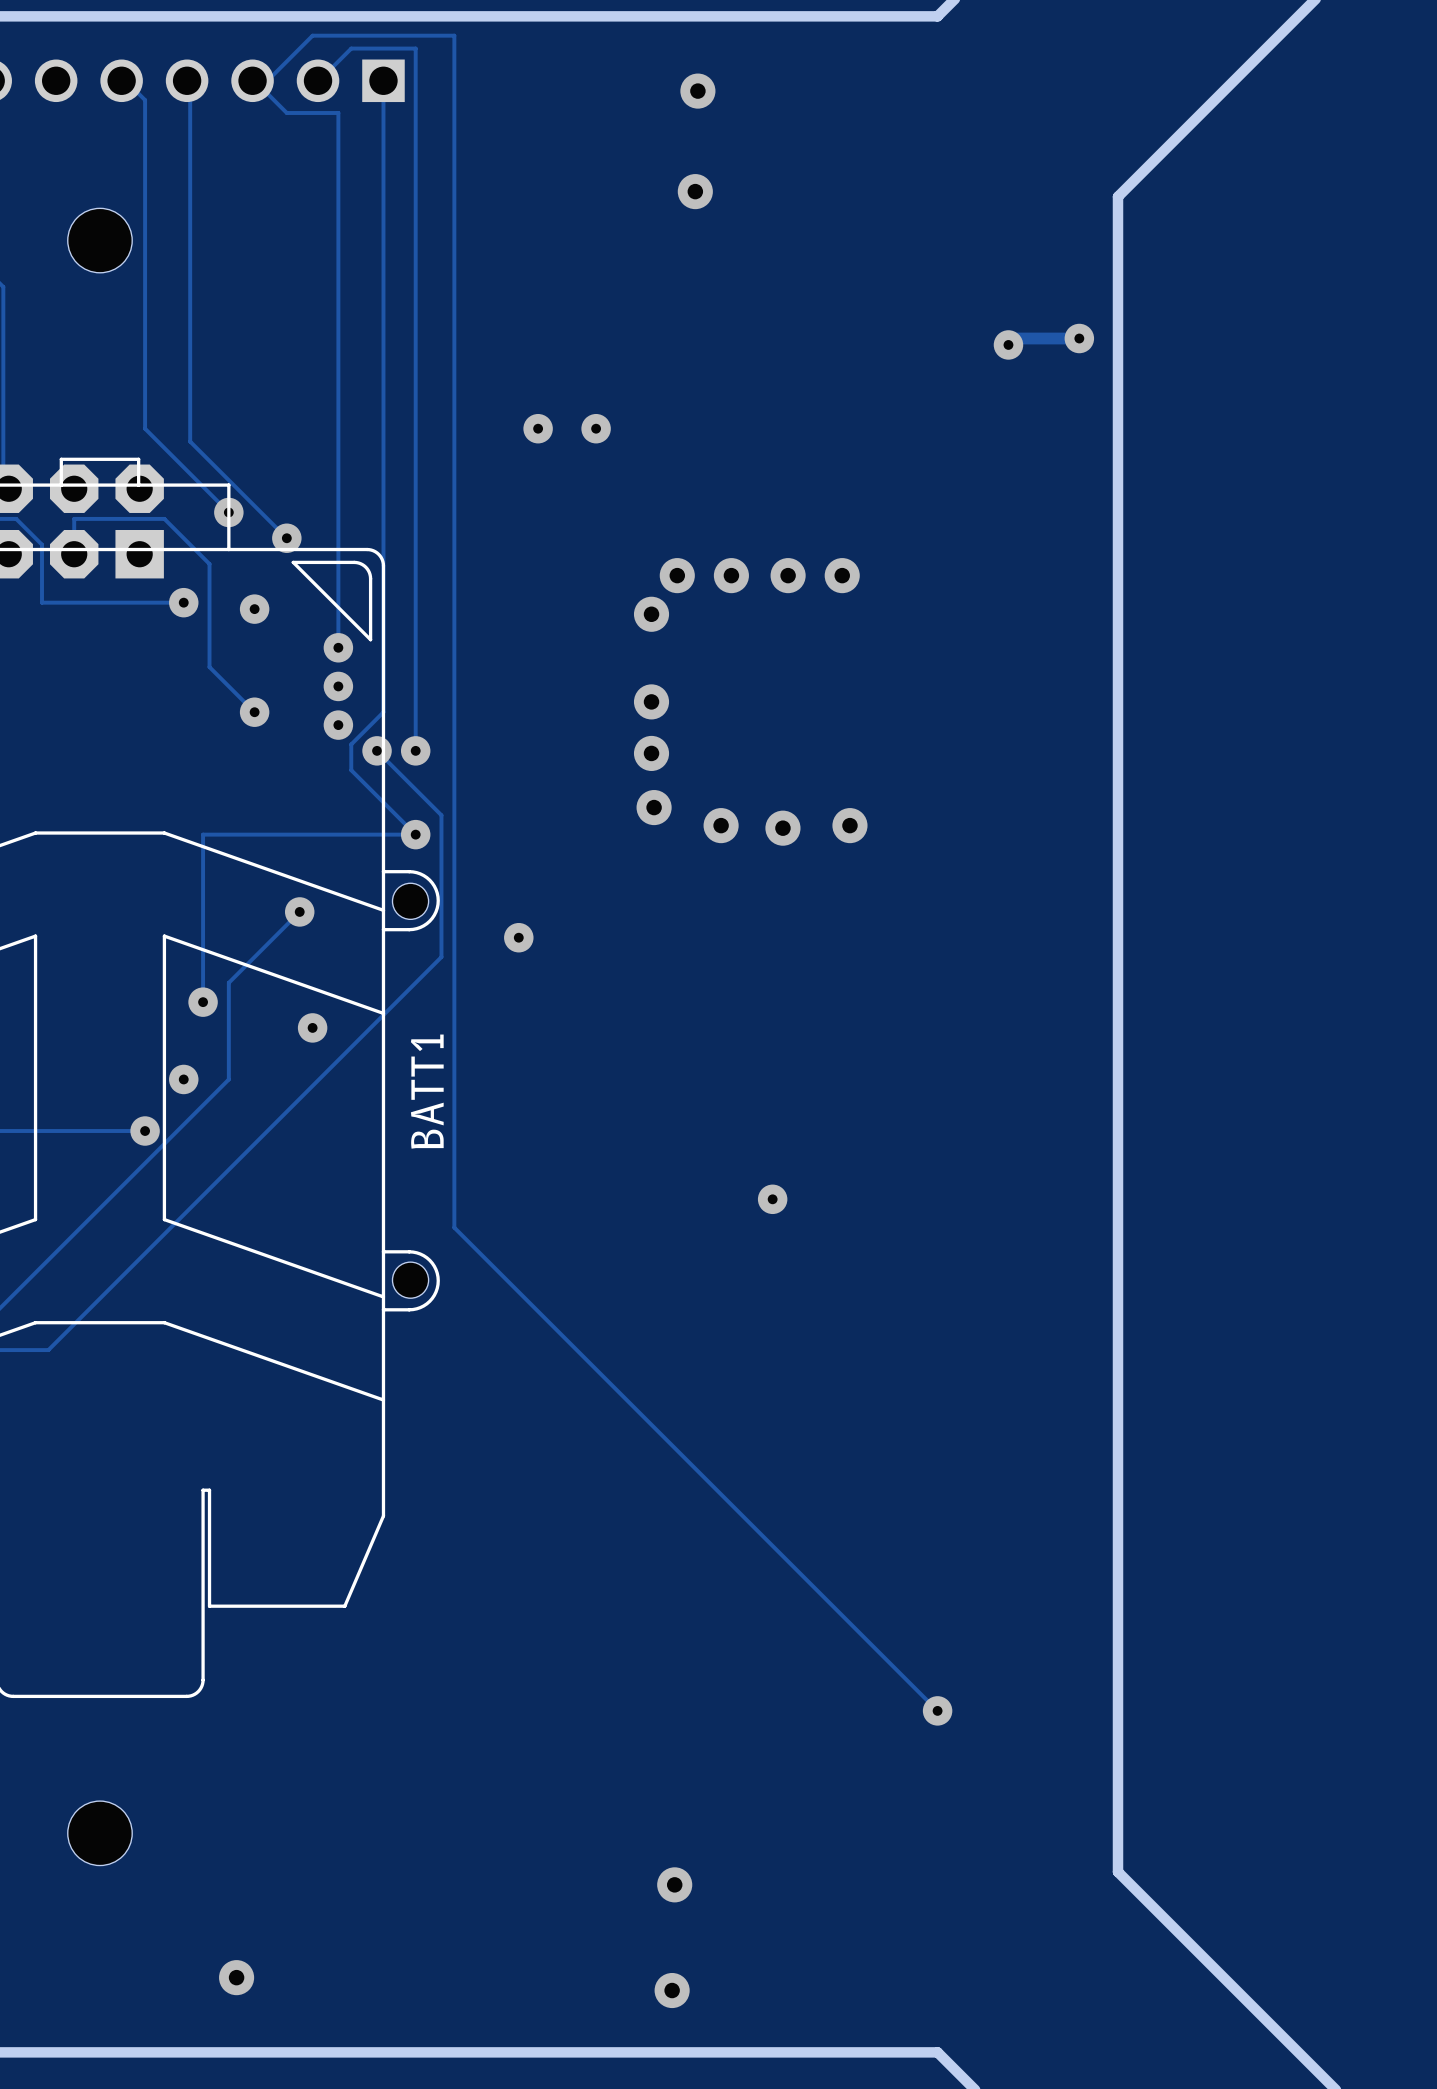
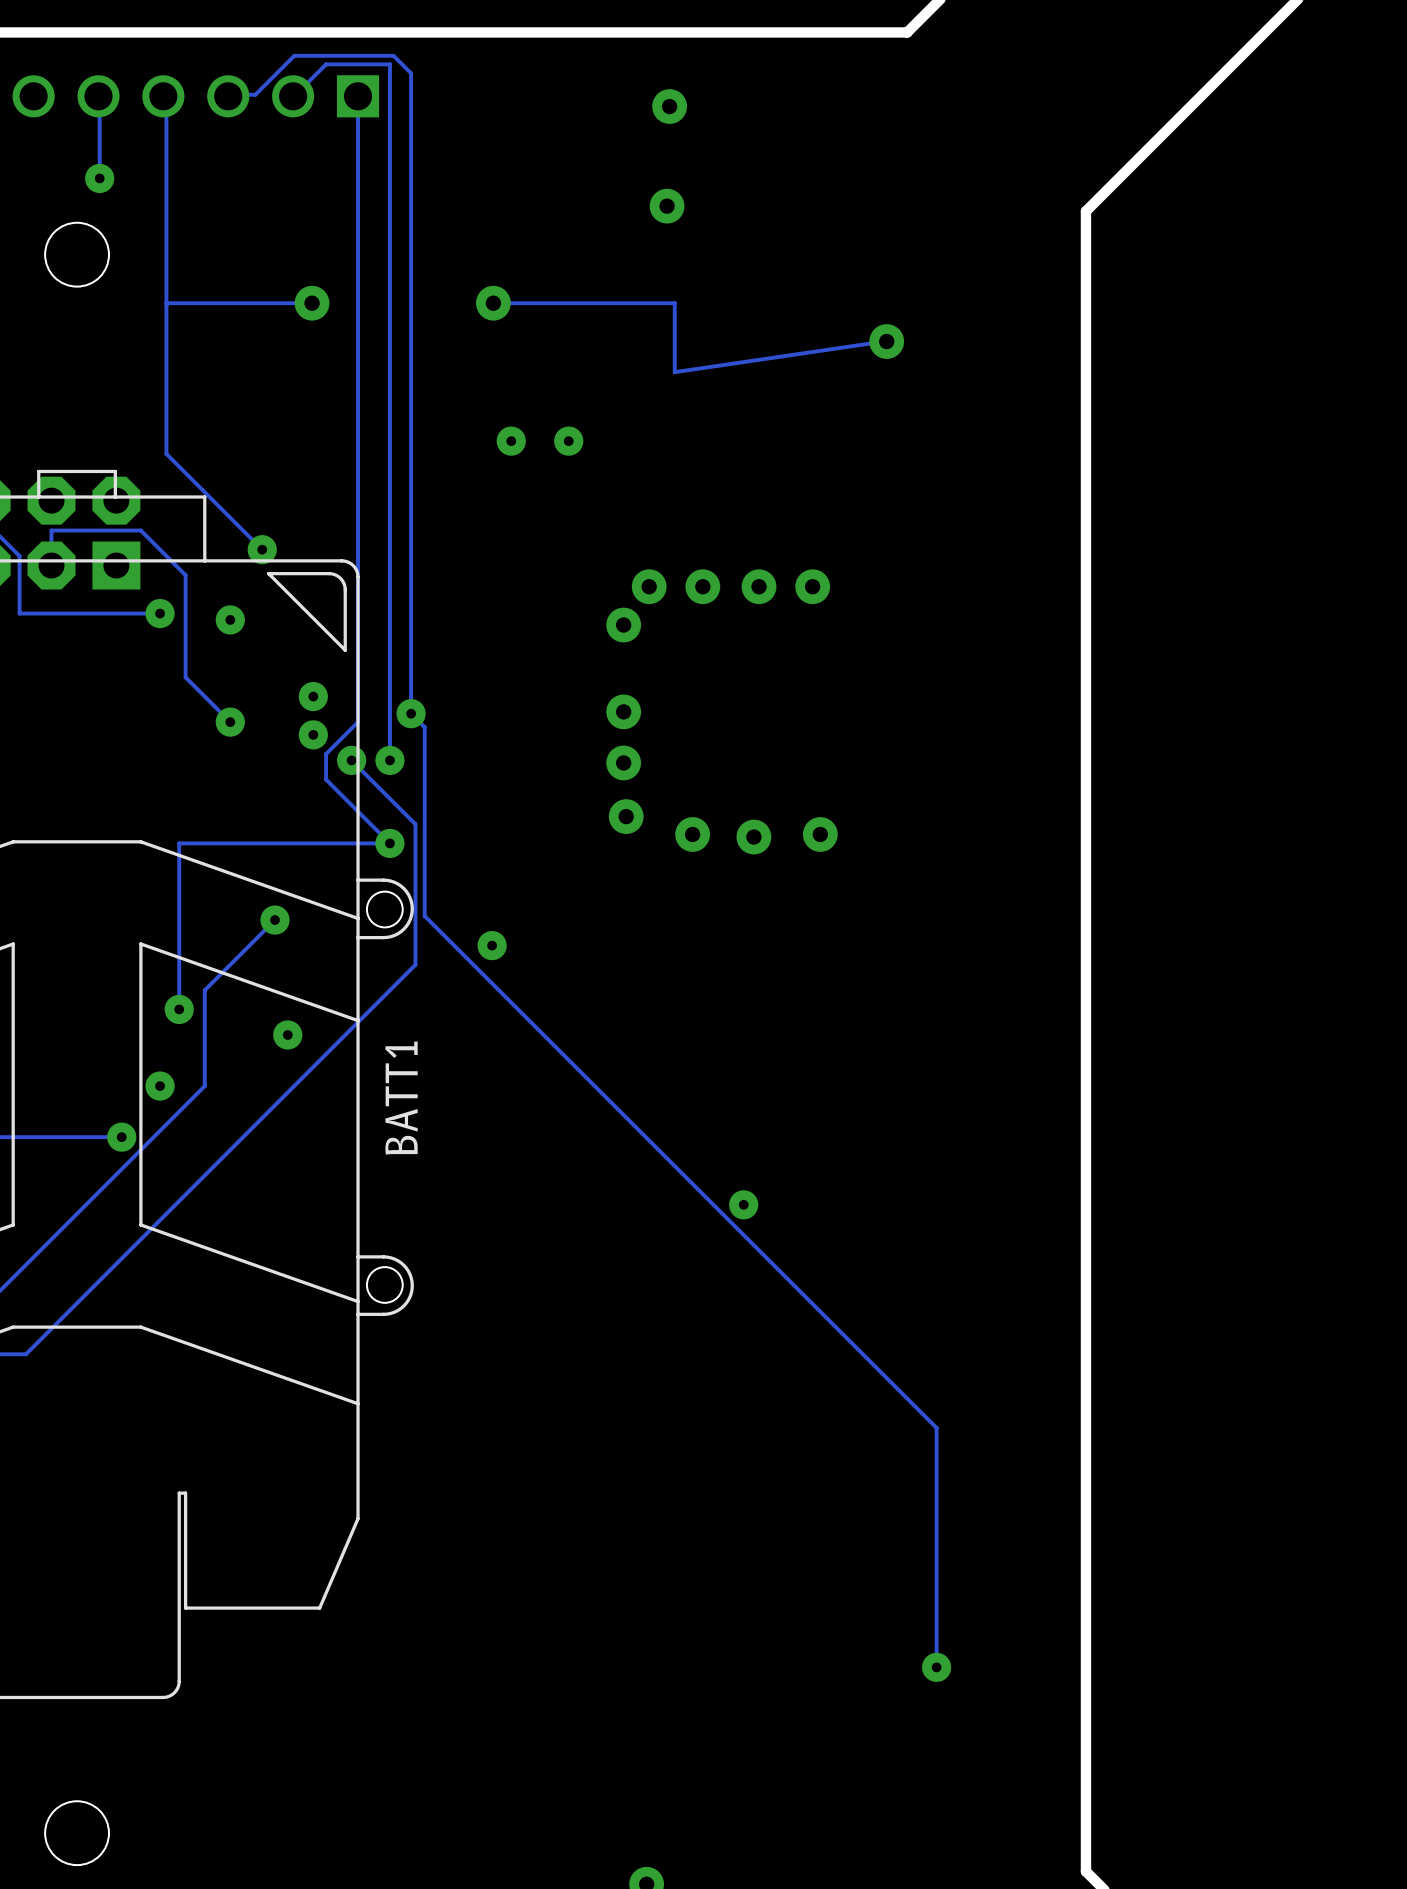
track: (121, 80) (125, 80) (145, 100) (145, 428) (228, 512) -> (98, 96) (99, 178)
track: none -> (228, 96) (255, 94) (294, 55) (393, 55) (411, 73) (411, 713) (424, 727) (424, 916) (936, 1427) (936, 1667)
via: none -> (99, 178)
track: none -> (312, 303) (166, 303)
via: none -> (312, 303)
track: none -> (493, 303) (674, 303) (674, 372) (886, 341)
via: none -> (493, 303)
via: none -> (886, 341)
track: (1079, 338) (1008, 338) (1008, 344) -> none
via: (1079, 338) -> none
via: (1008, 344) -> none
via: (228, 512) -> none
track: (338, 647) (338, 113) (286, 113) (252, 80) (261, 87) (312, 35) (454, 35) (454, 1227) (937, 1710) -> none
via position: (338, 647) -> (411, 713)
via position: (937, 1710) -> (936, 1667)

